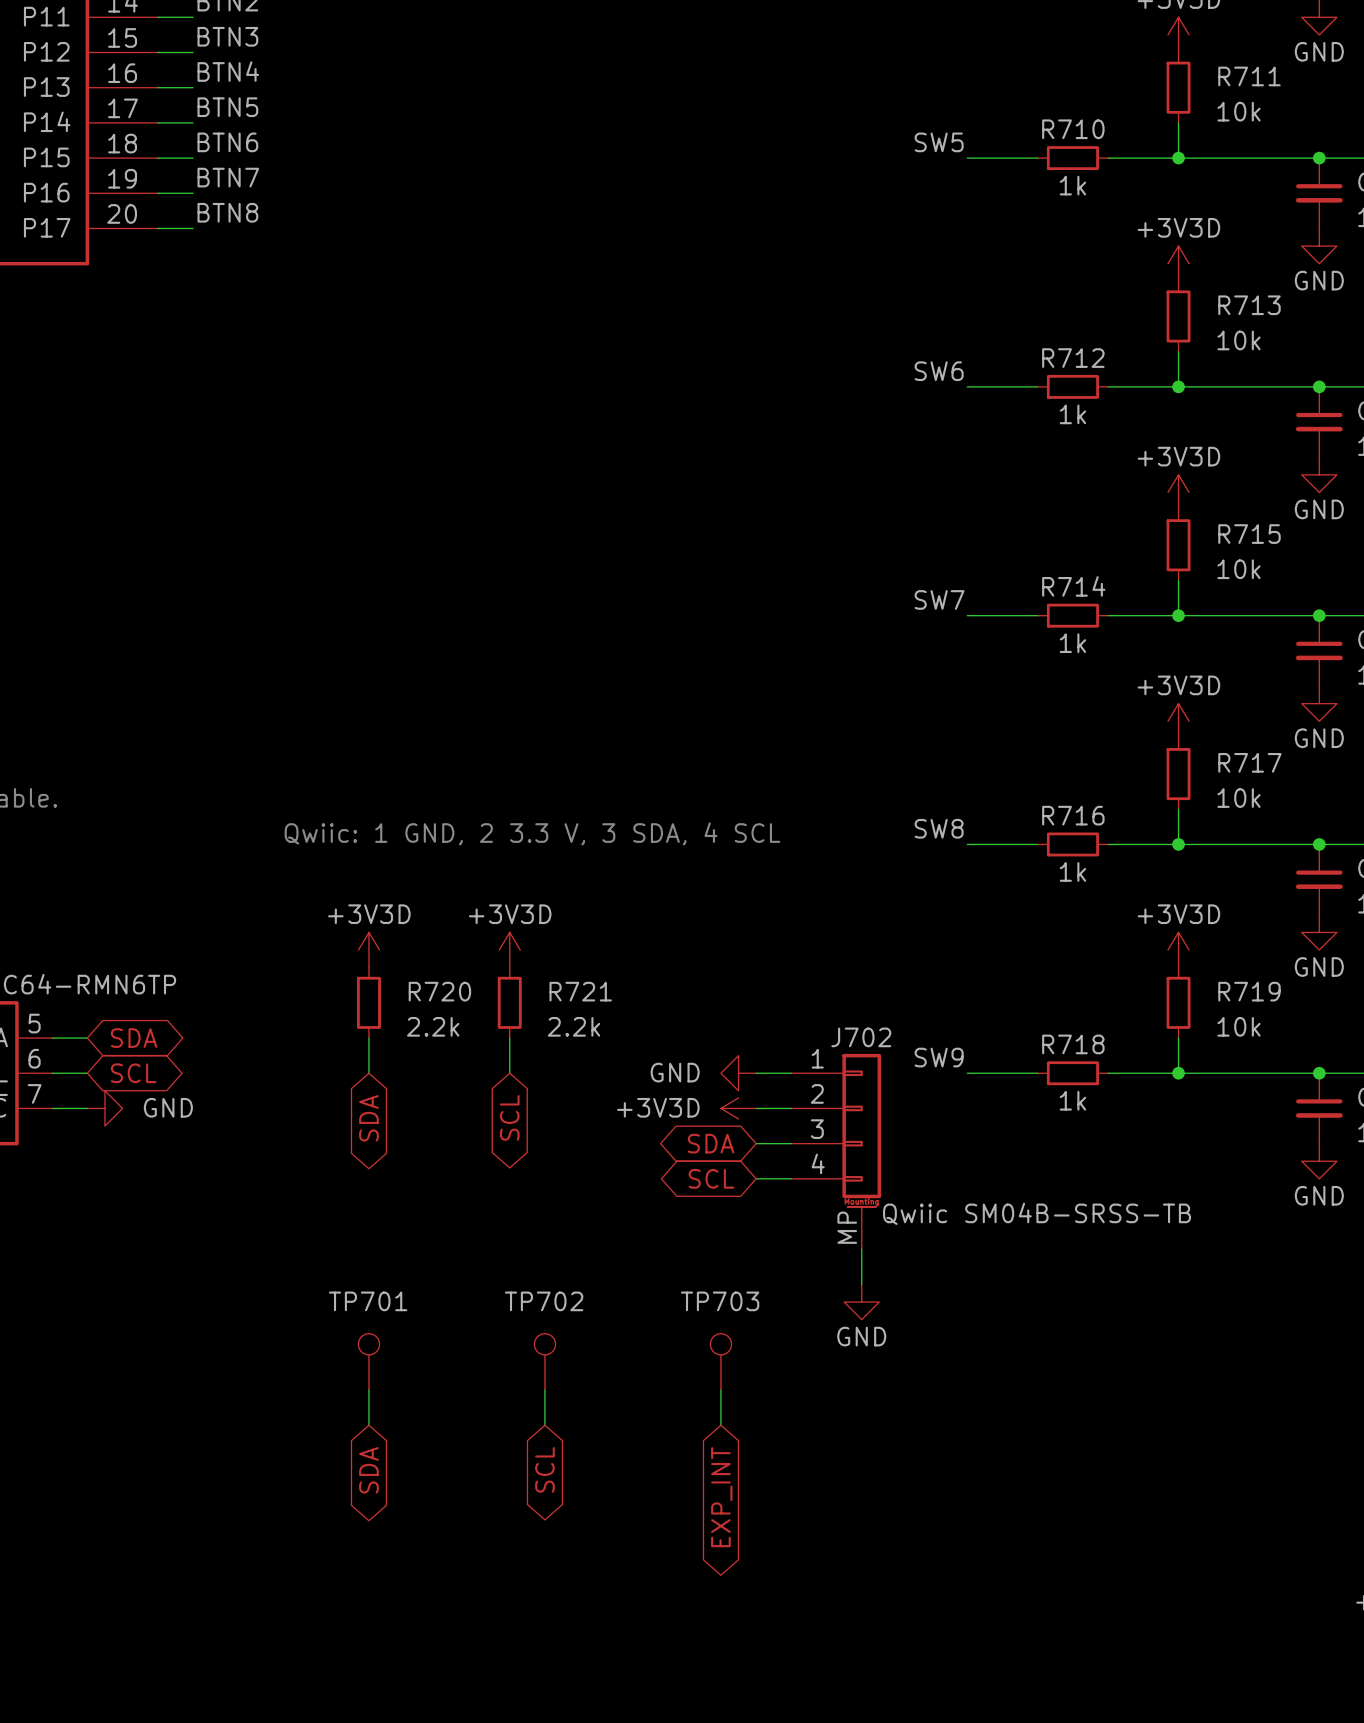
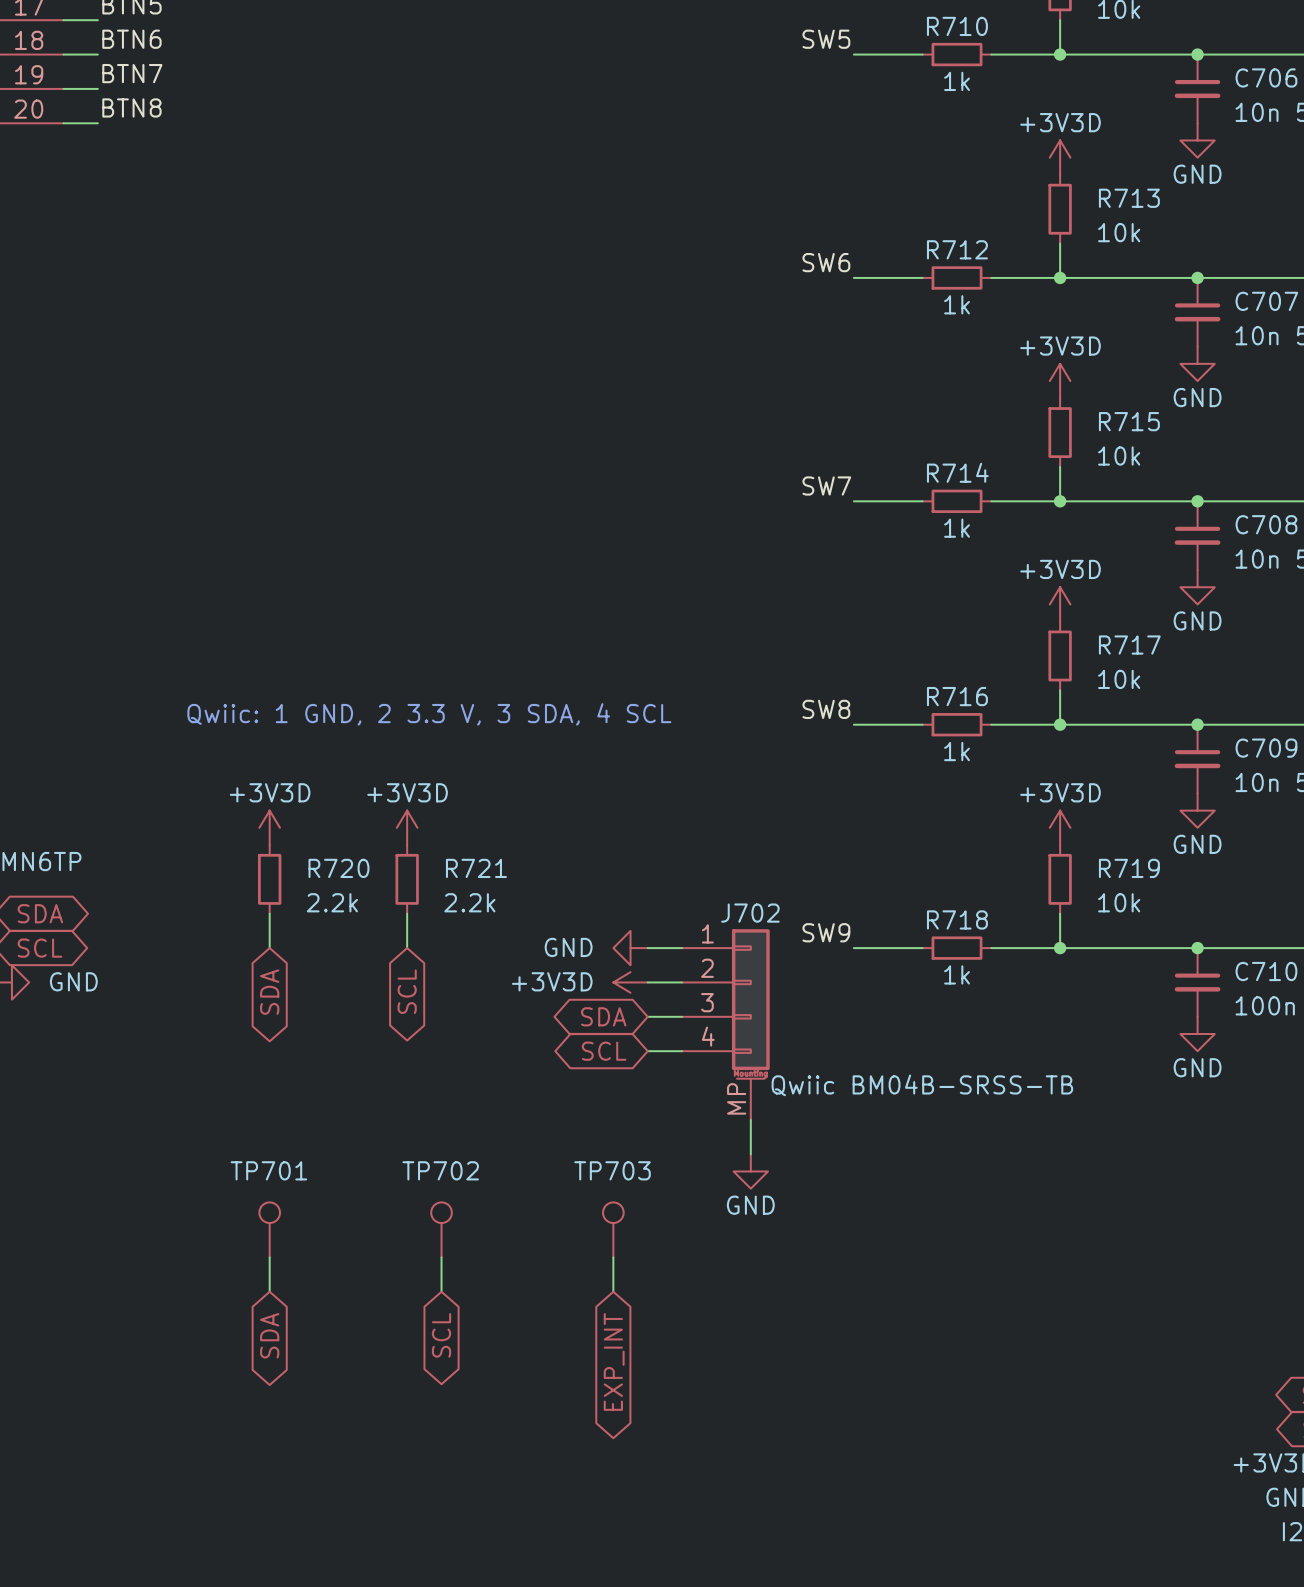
J702 value: Qwiic SM04B-SRSS-TB (1037, 1213) -> Qwiic BM04B-SRSS-TB (922, 1085)

